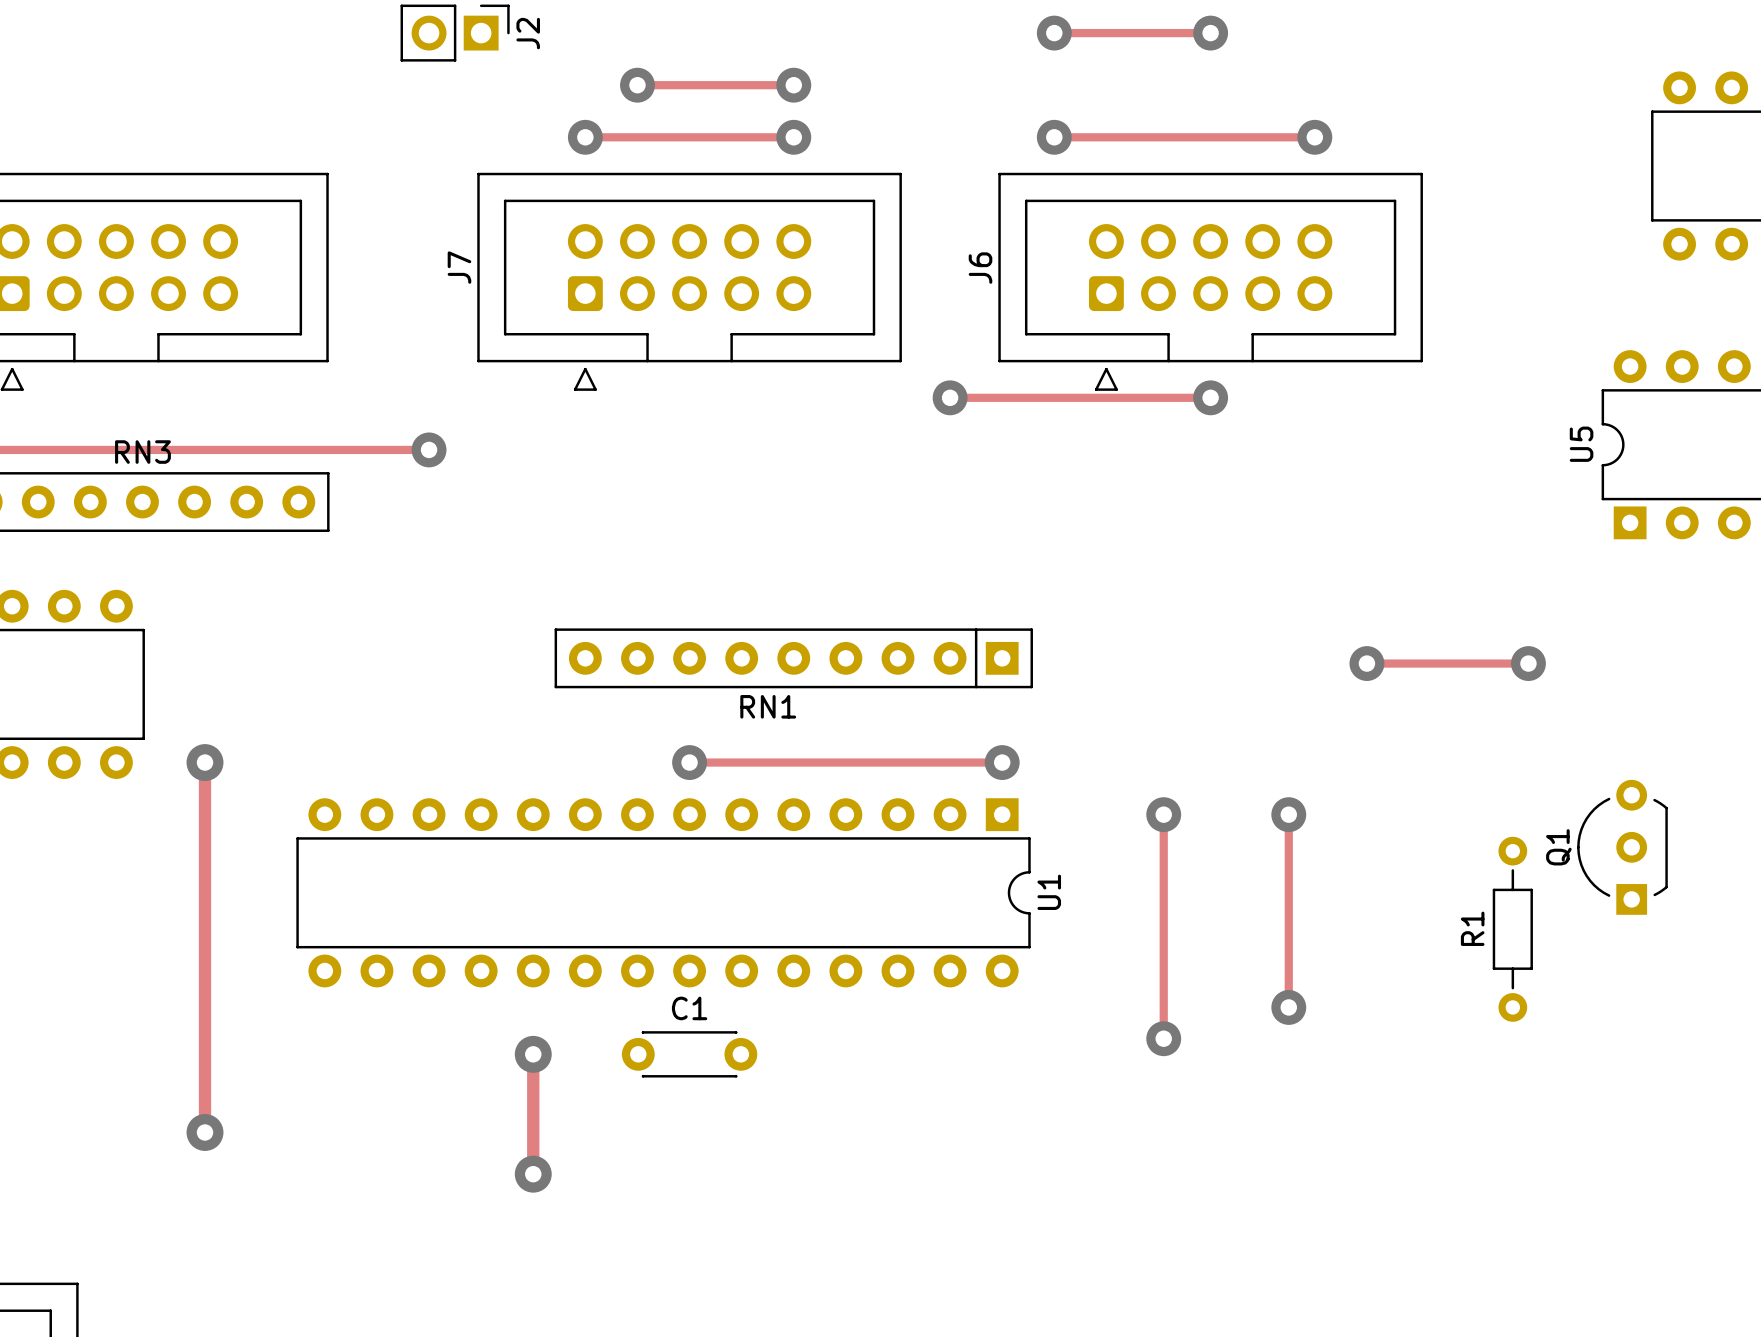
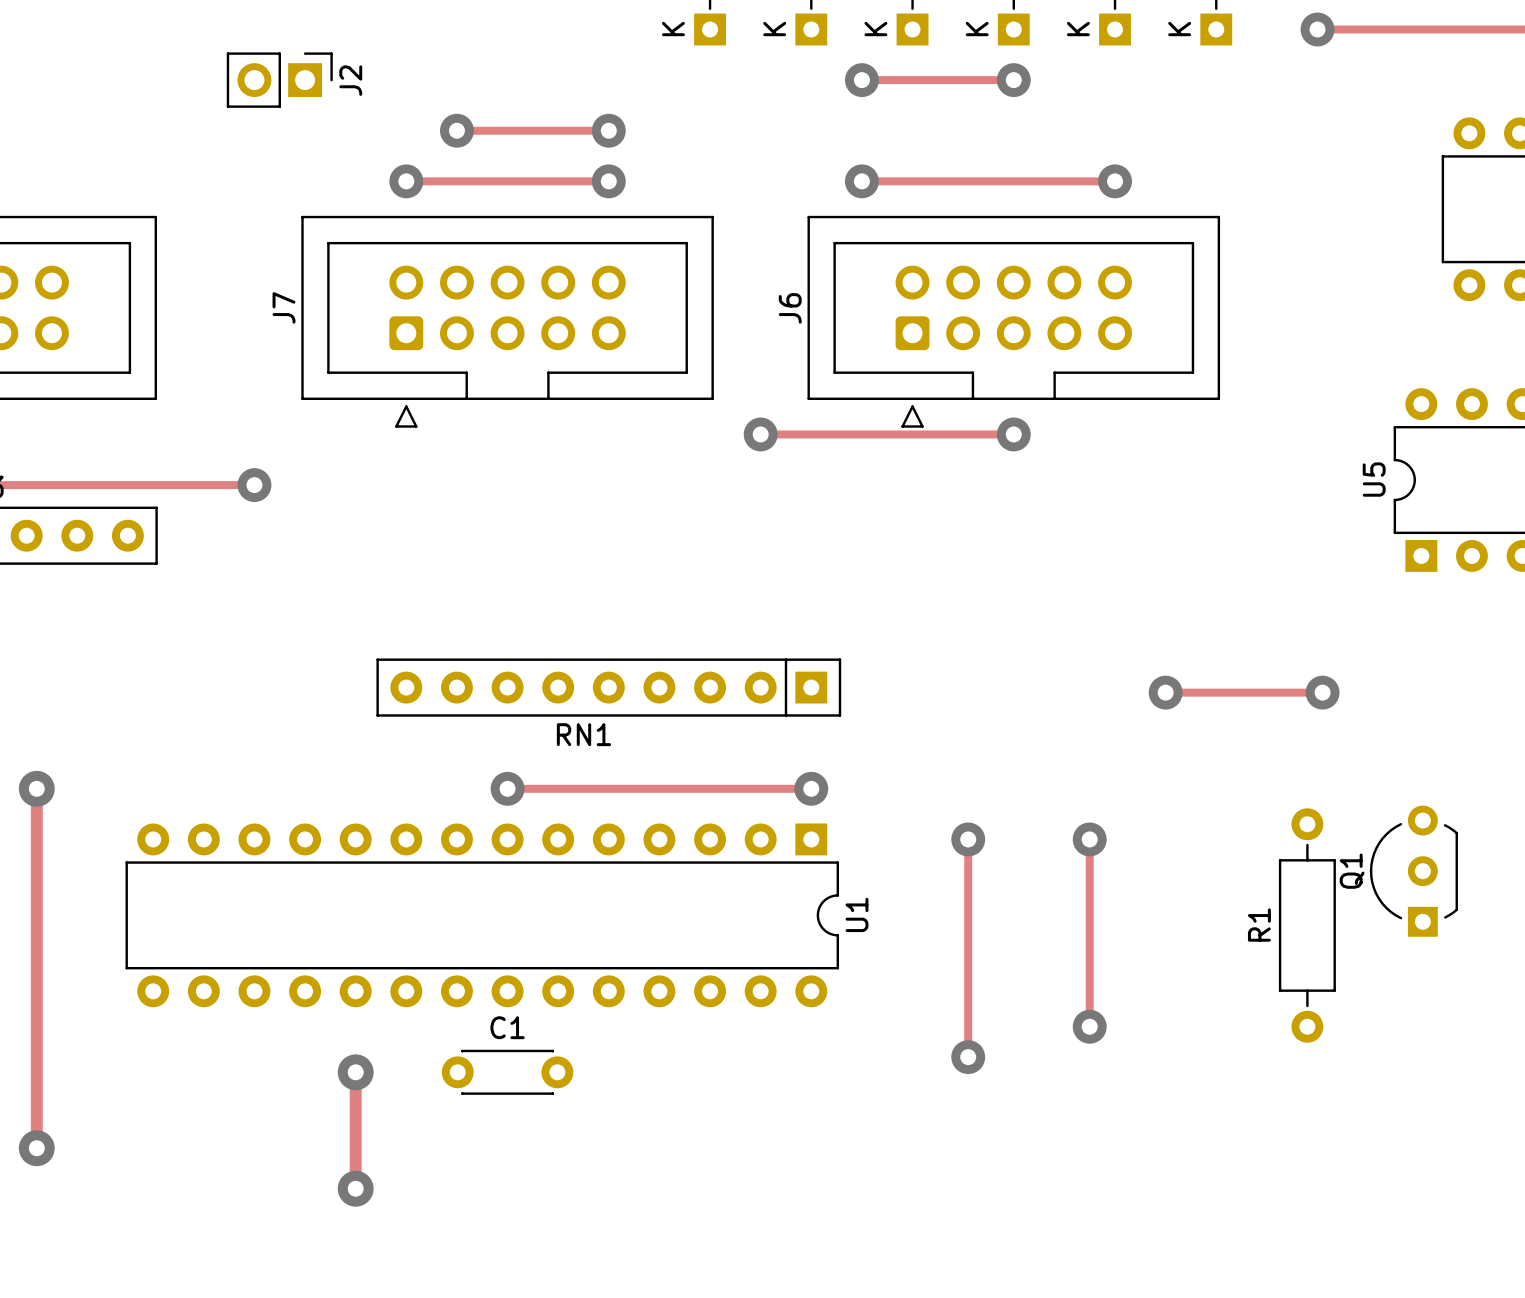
R1 footprint: [1492, 836, 1533, 1022] -> [1278, 808, 1336, 1043]

